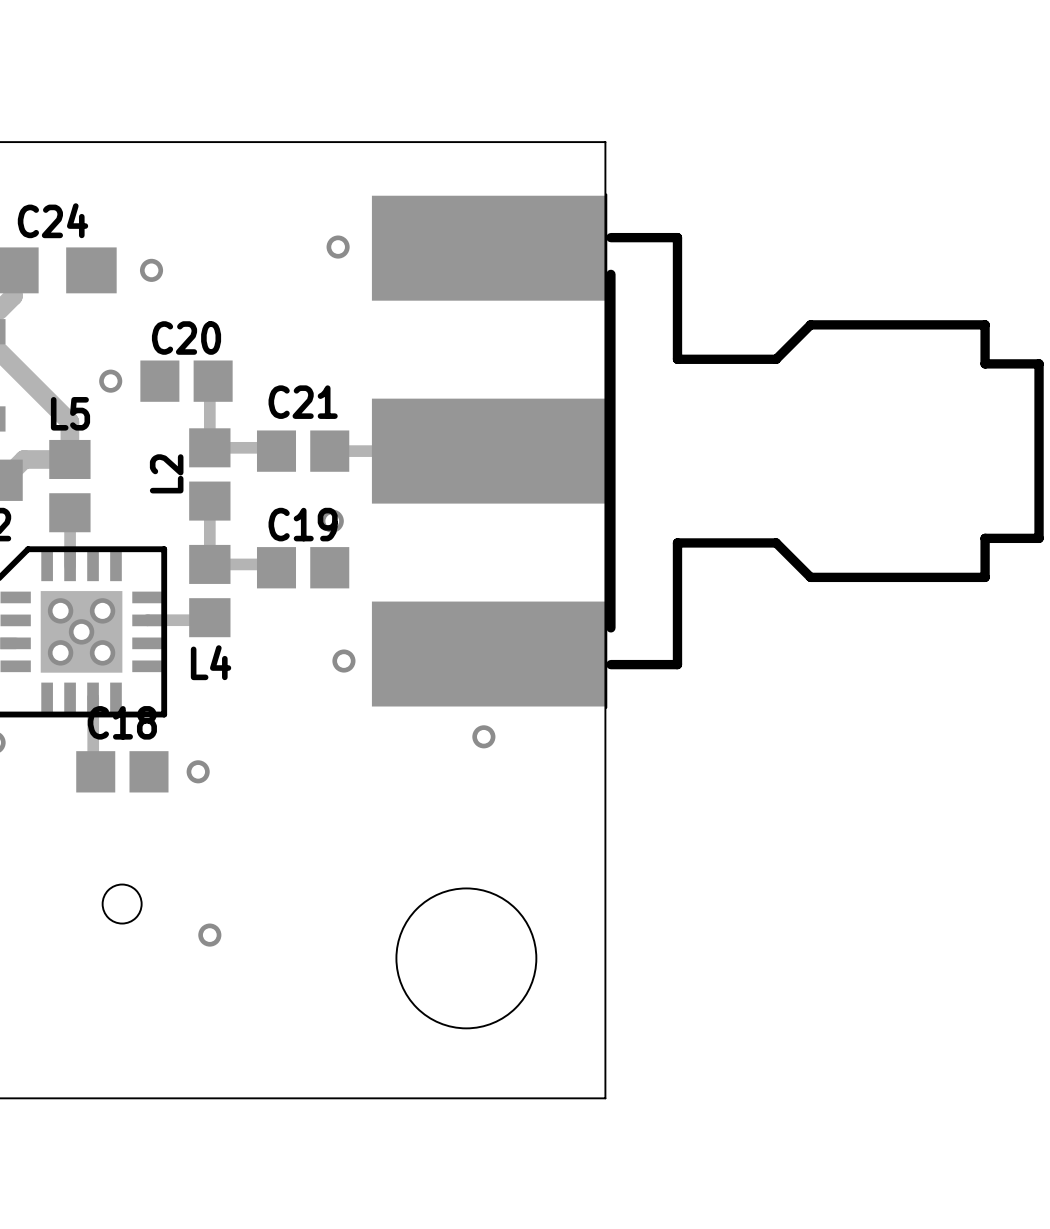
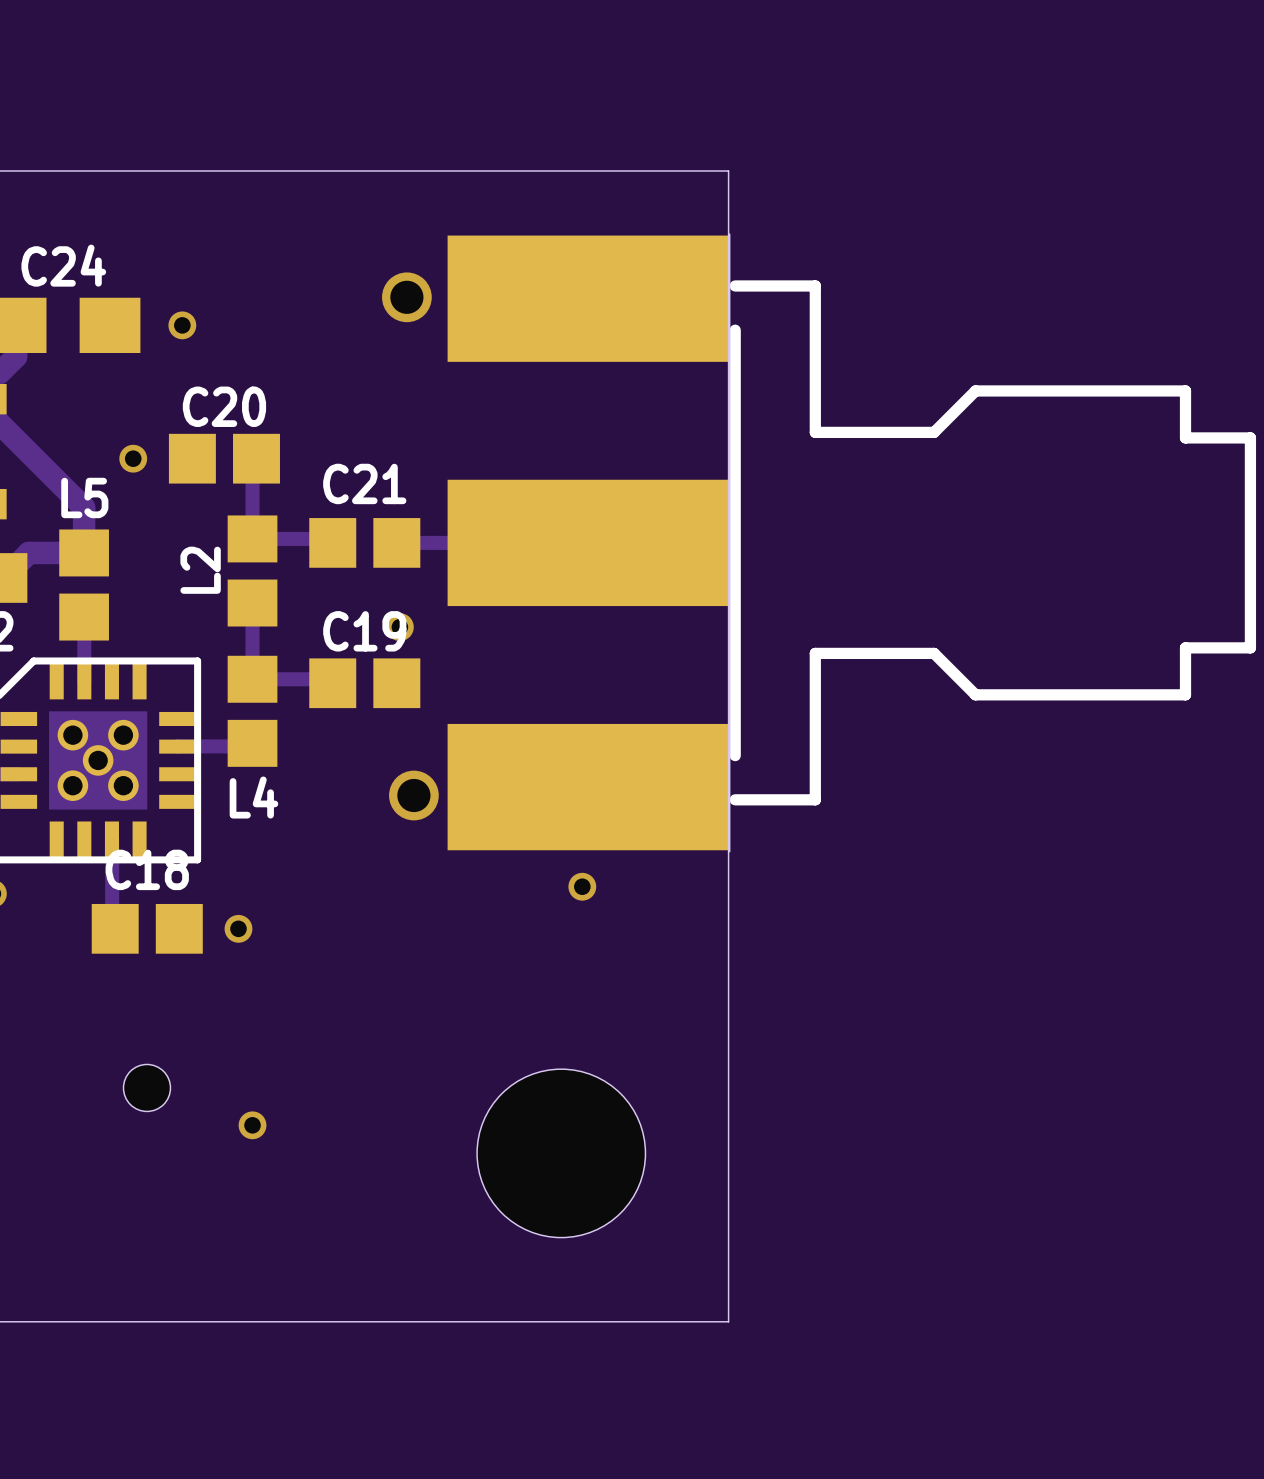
via size: [326, 235, 350, 259] -> [382, 272, 432, 323]
via size: [332, 649, 356, 673] -> [389, 770, 439, 821]

